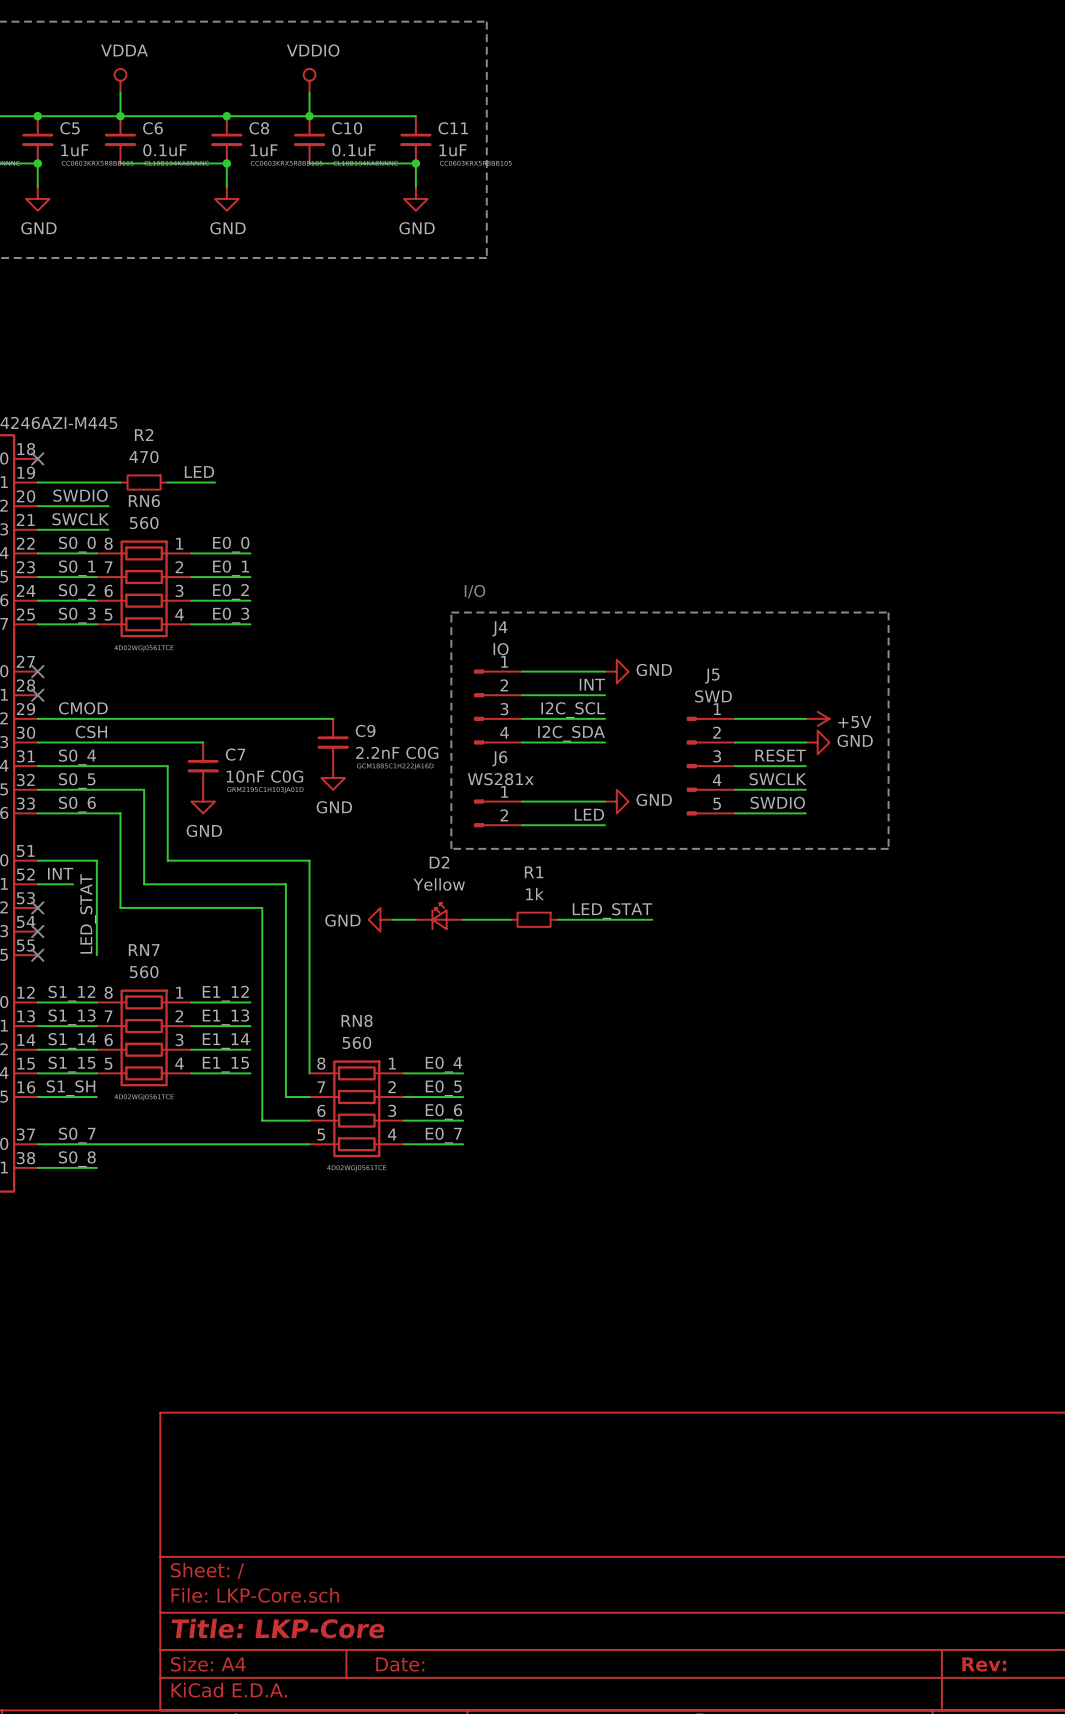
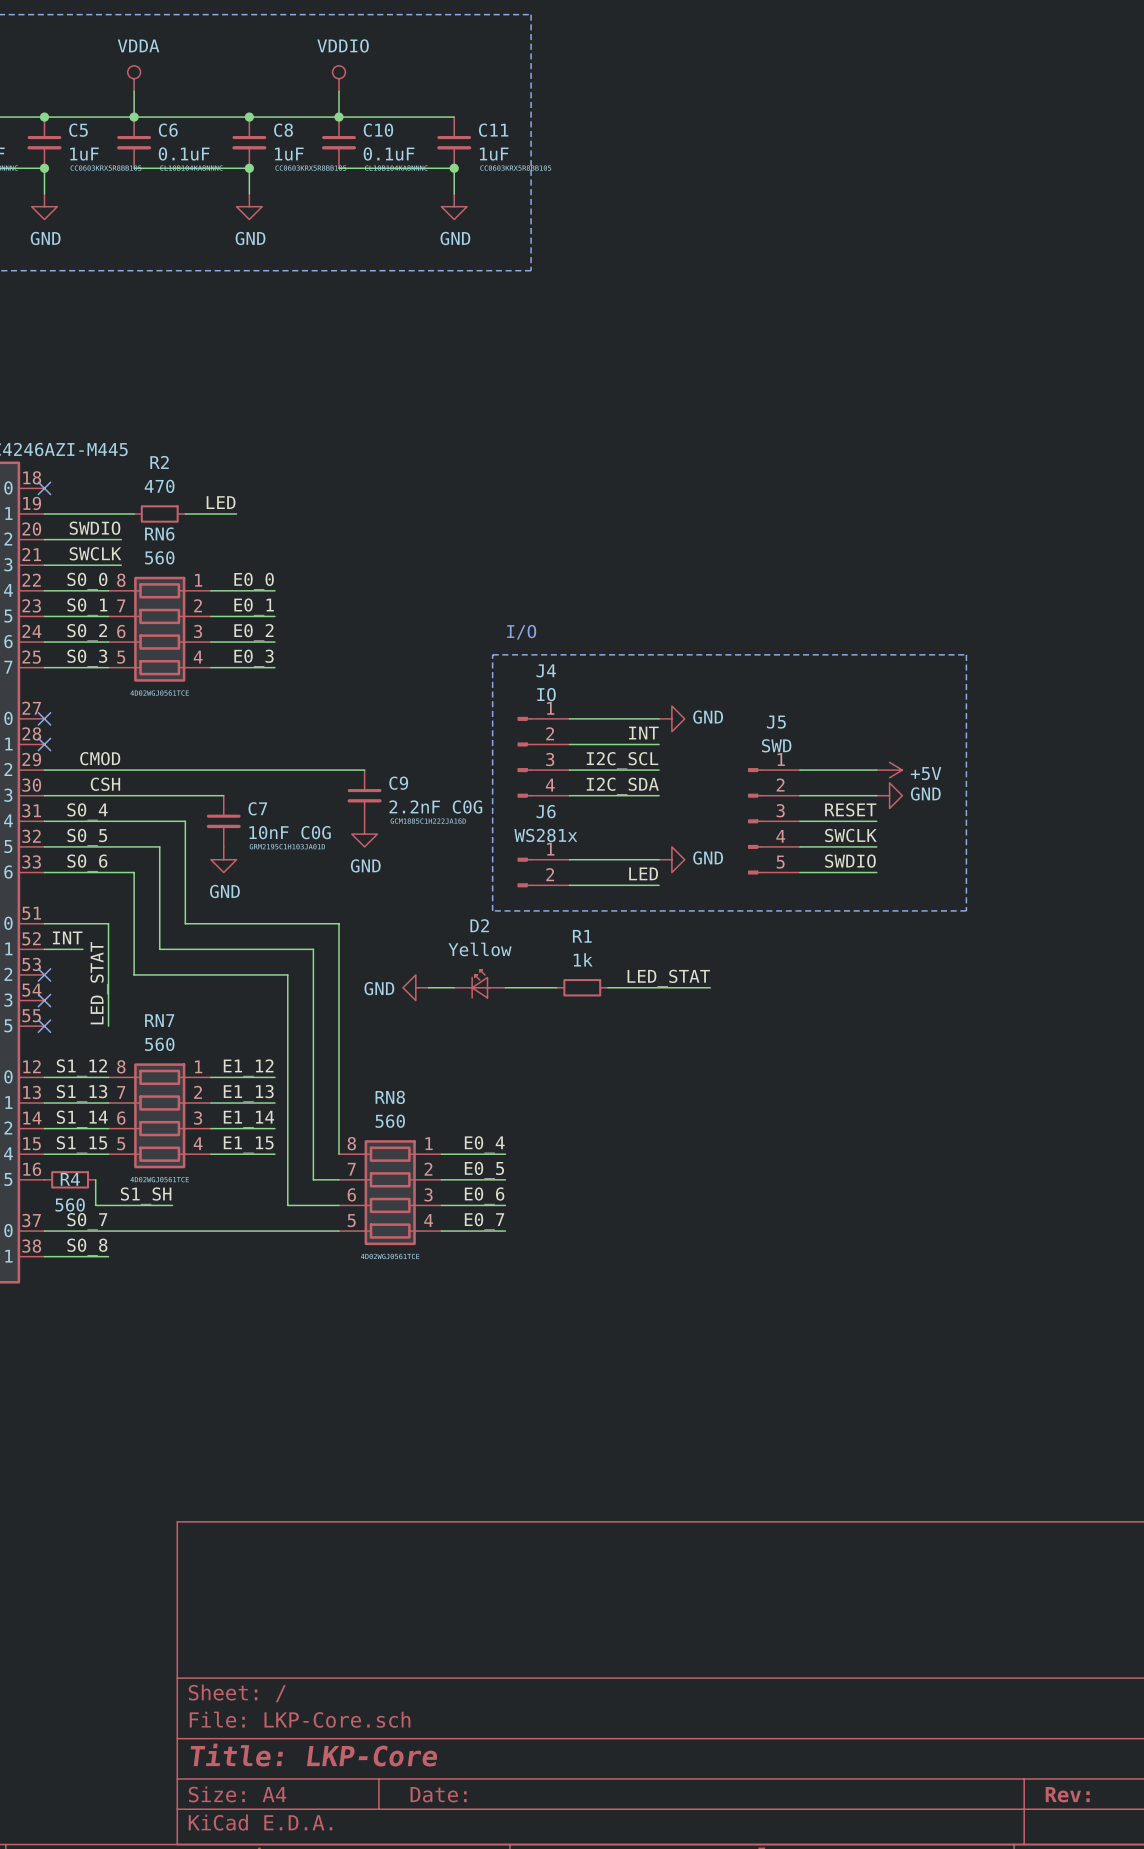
label position: S1_SH (70, 1088) -> S1_SH (146, 1195)
wire: (37, 1097) (96, 1097) -> none
R4: none -> 560 (70, 1179)
wire: none -> (95, 1179) (95, 1205) (172, 1205)

